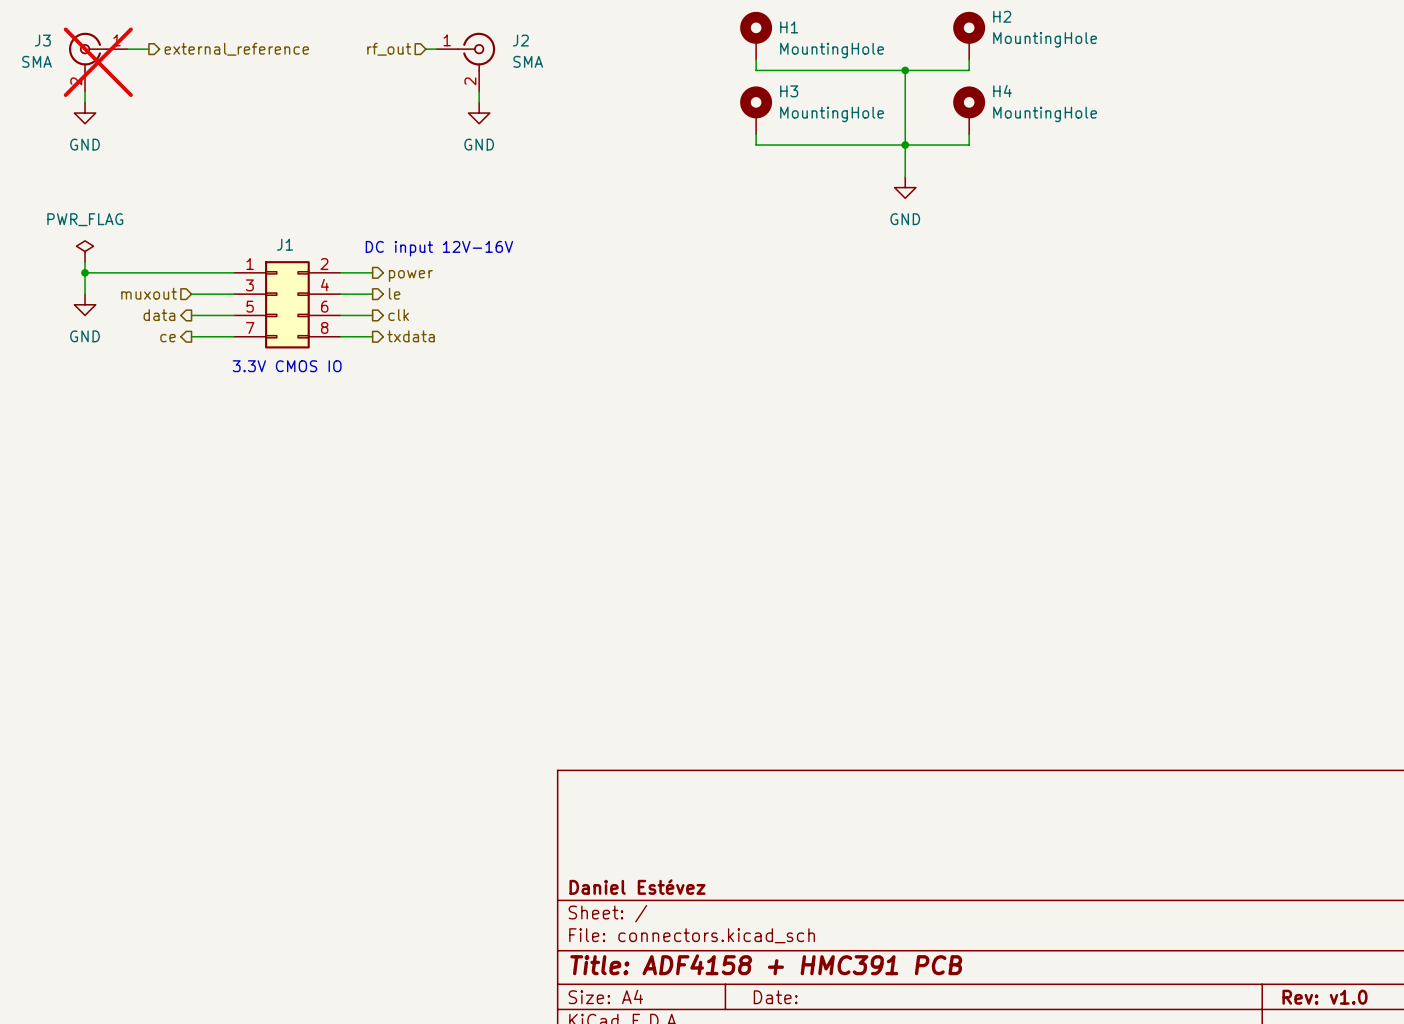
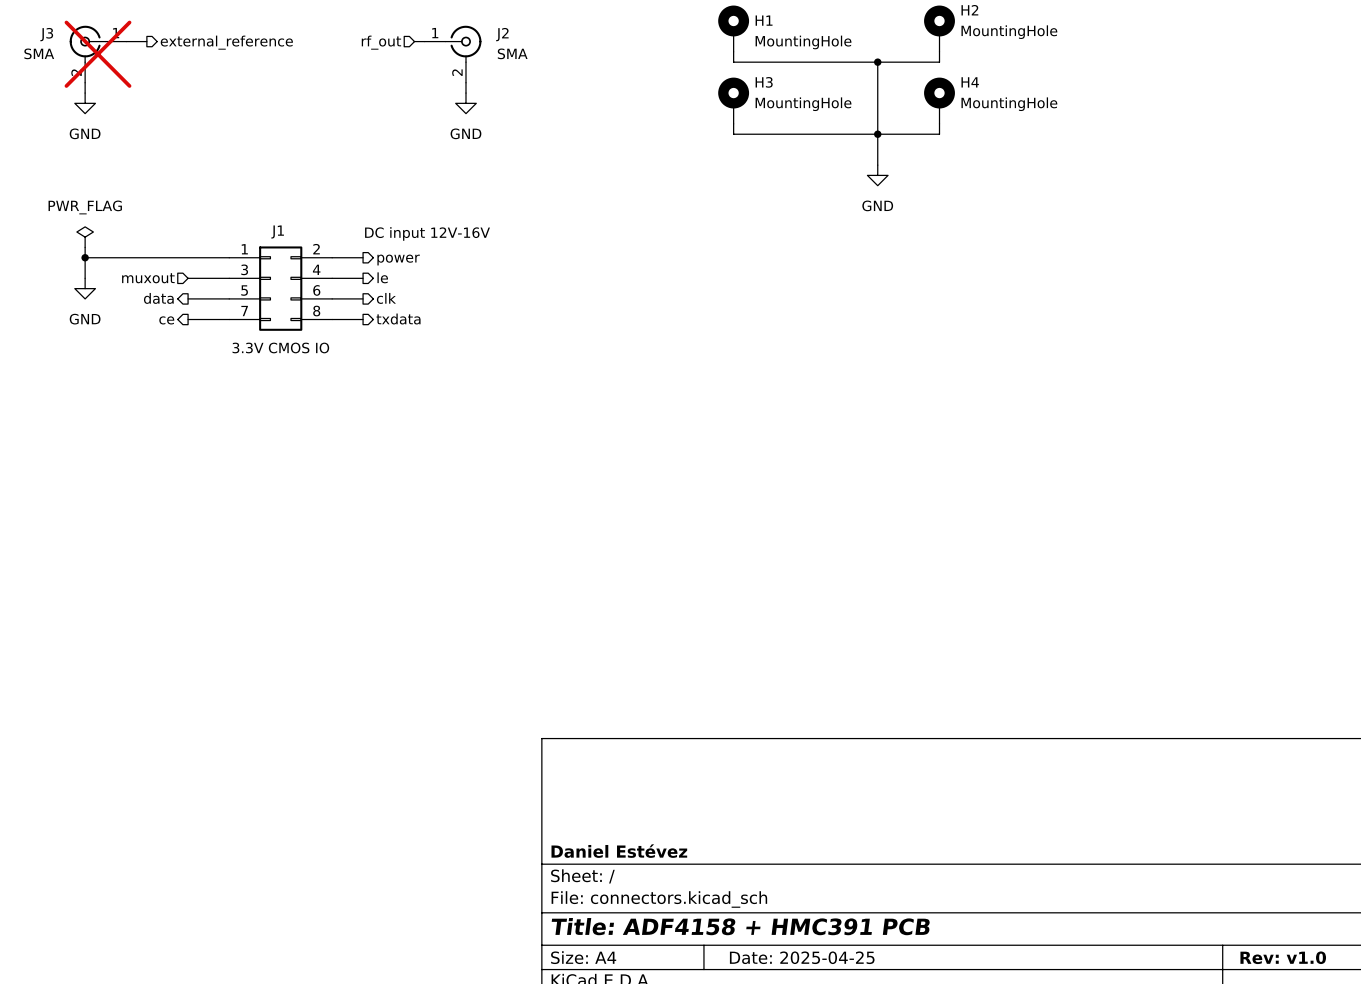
title block: Date: (775, 997) -> Date: 2025-04-25 (802, 957)

